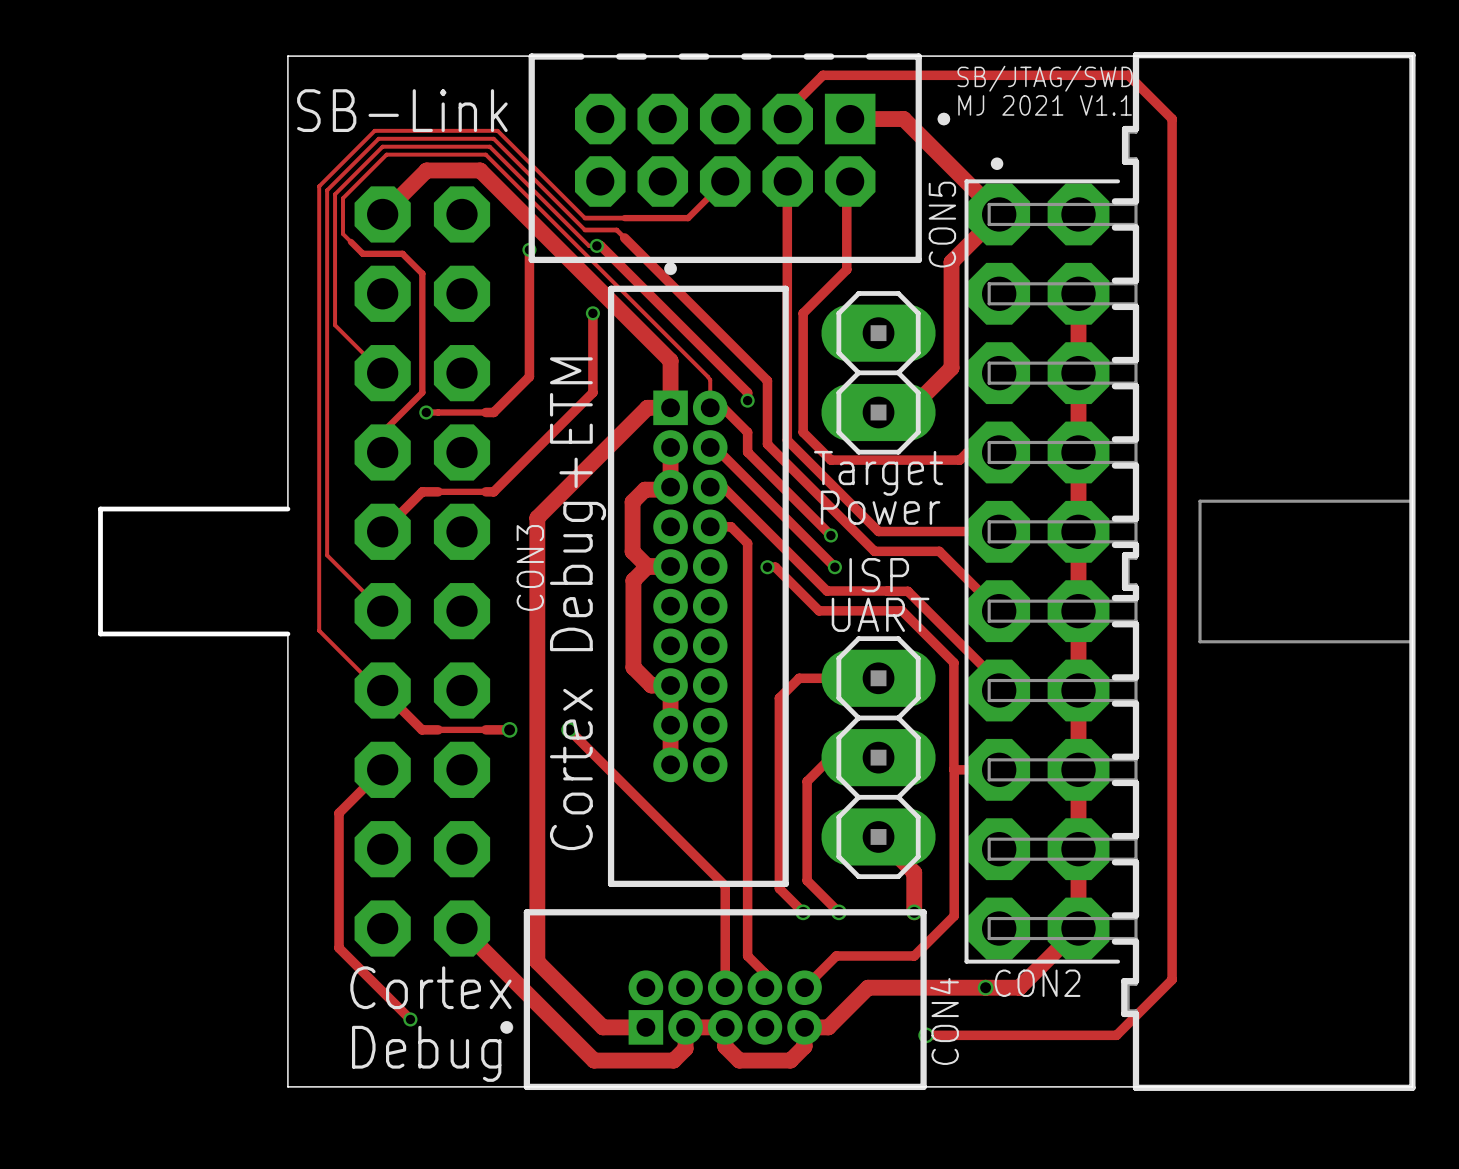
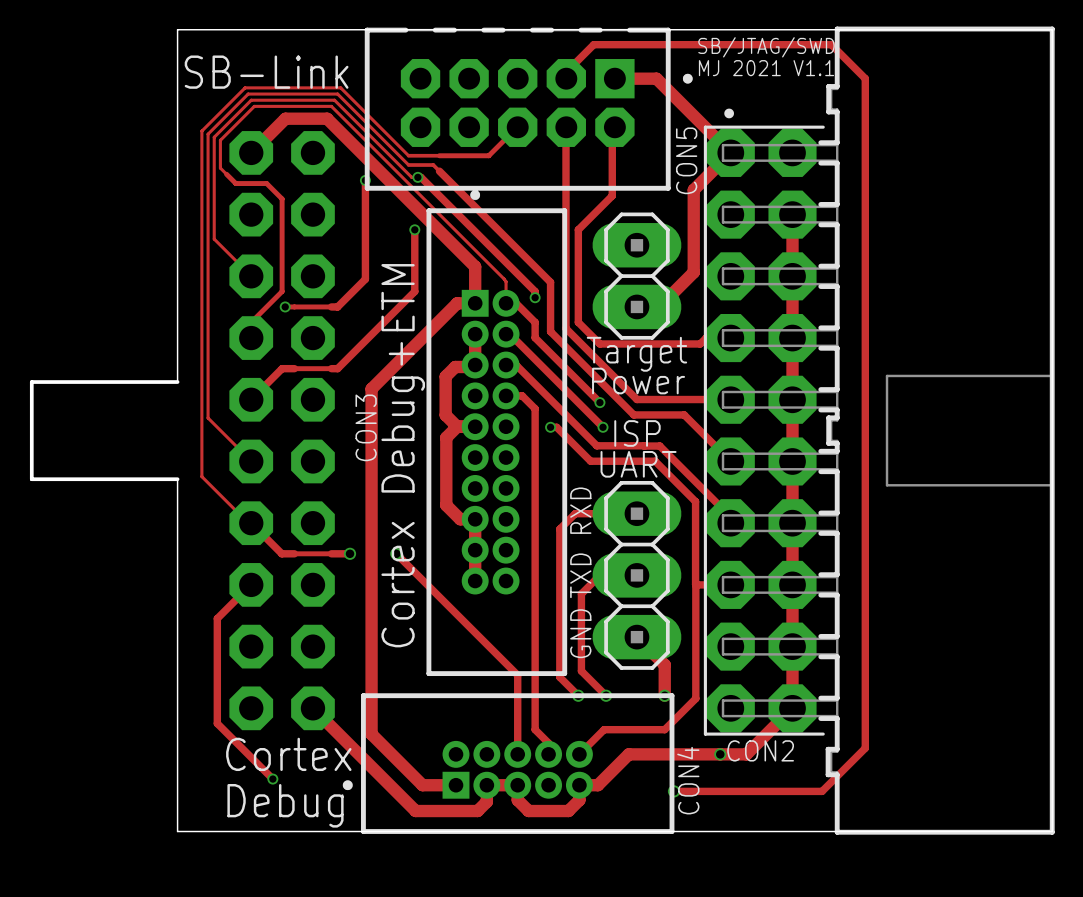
text: none -> RXD (580, 510)
text: none -> TXD (580, 575)
text: none -> GND (580, 633)

